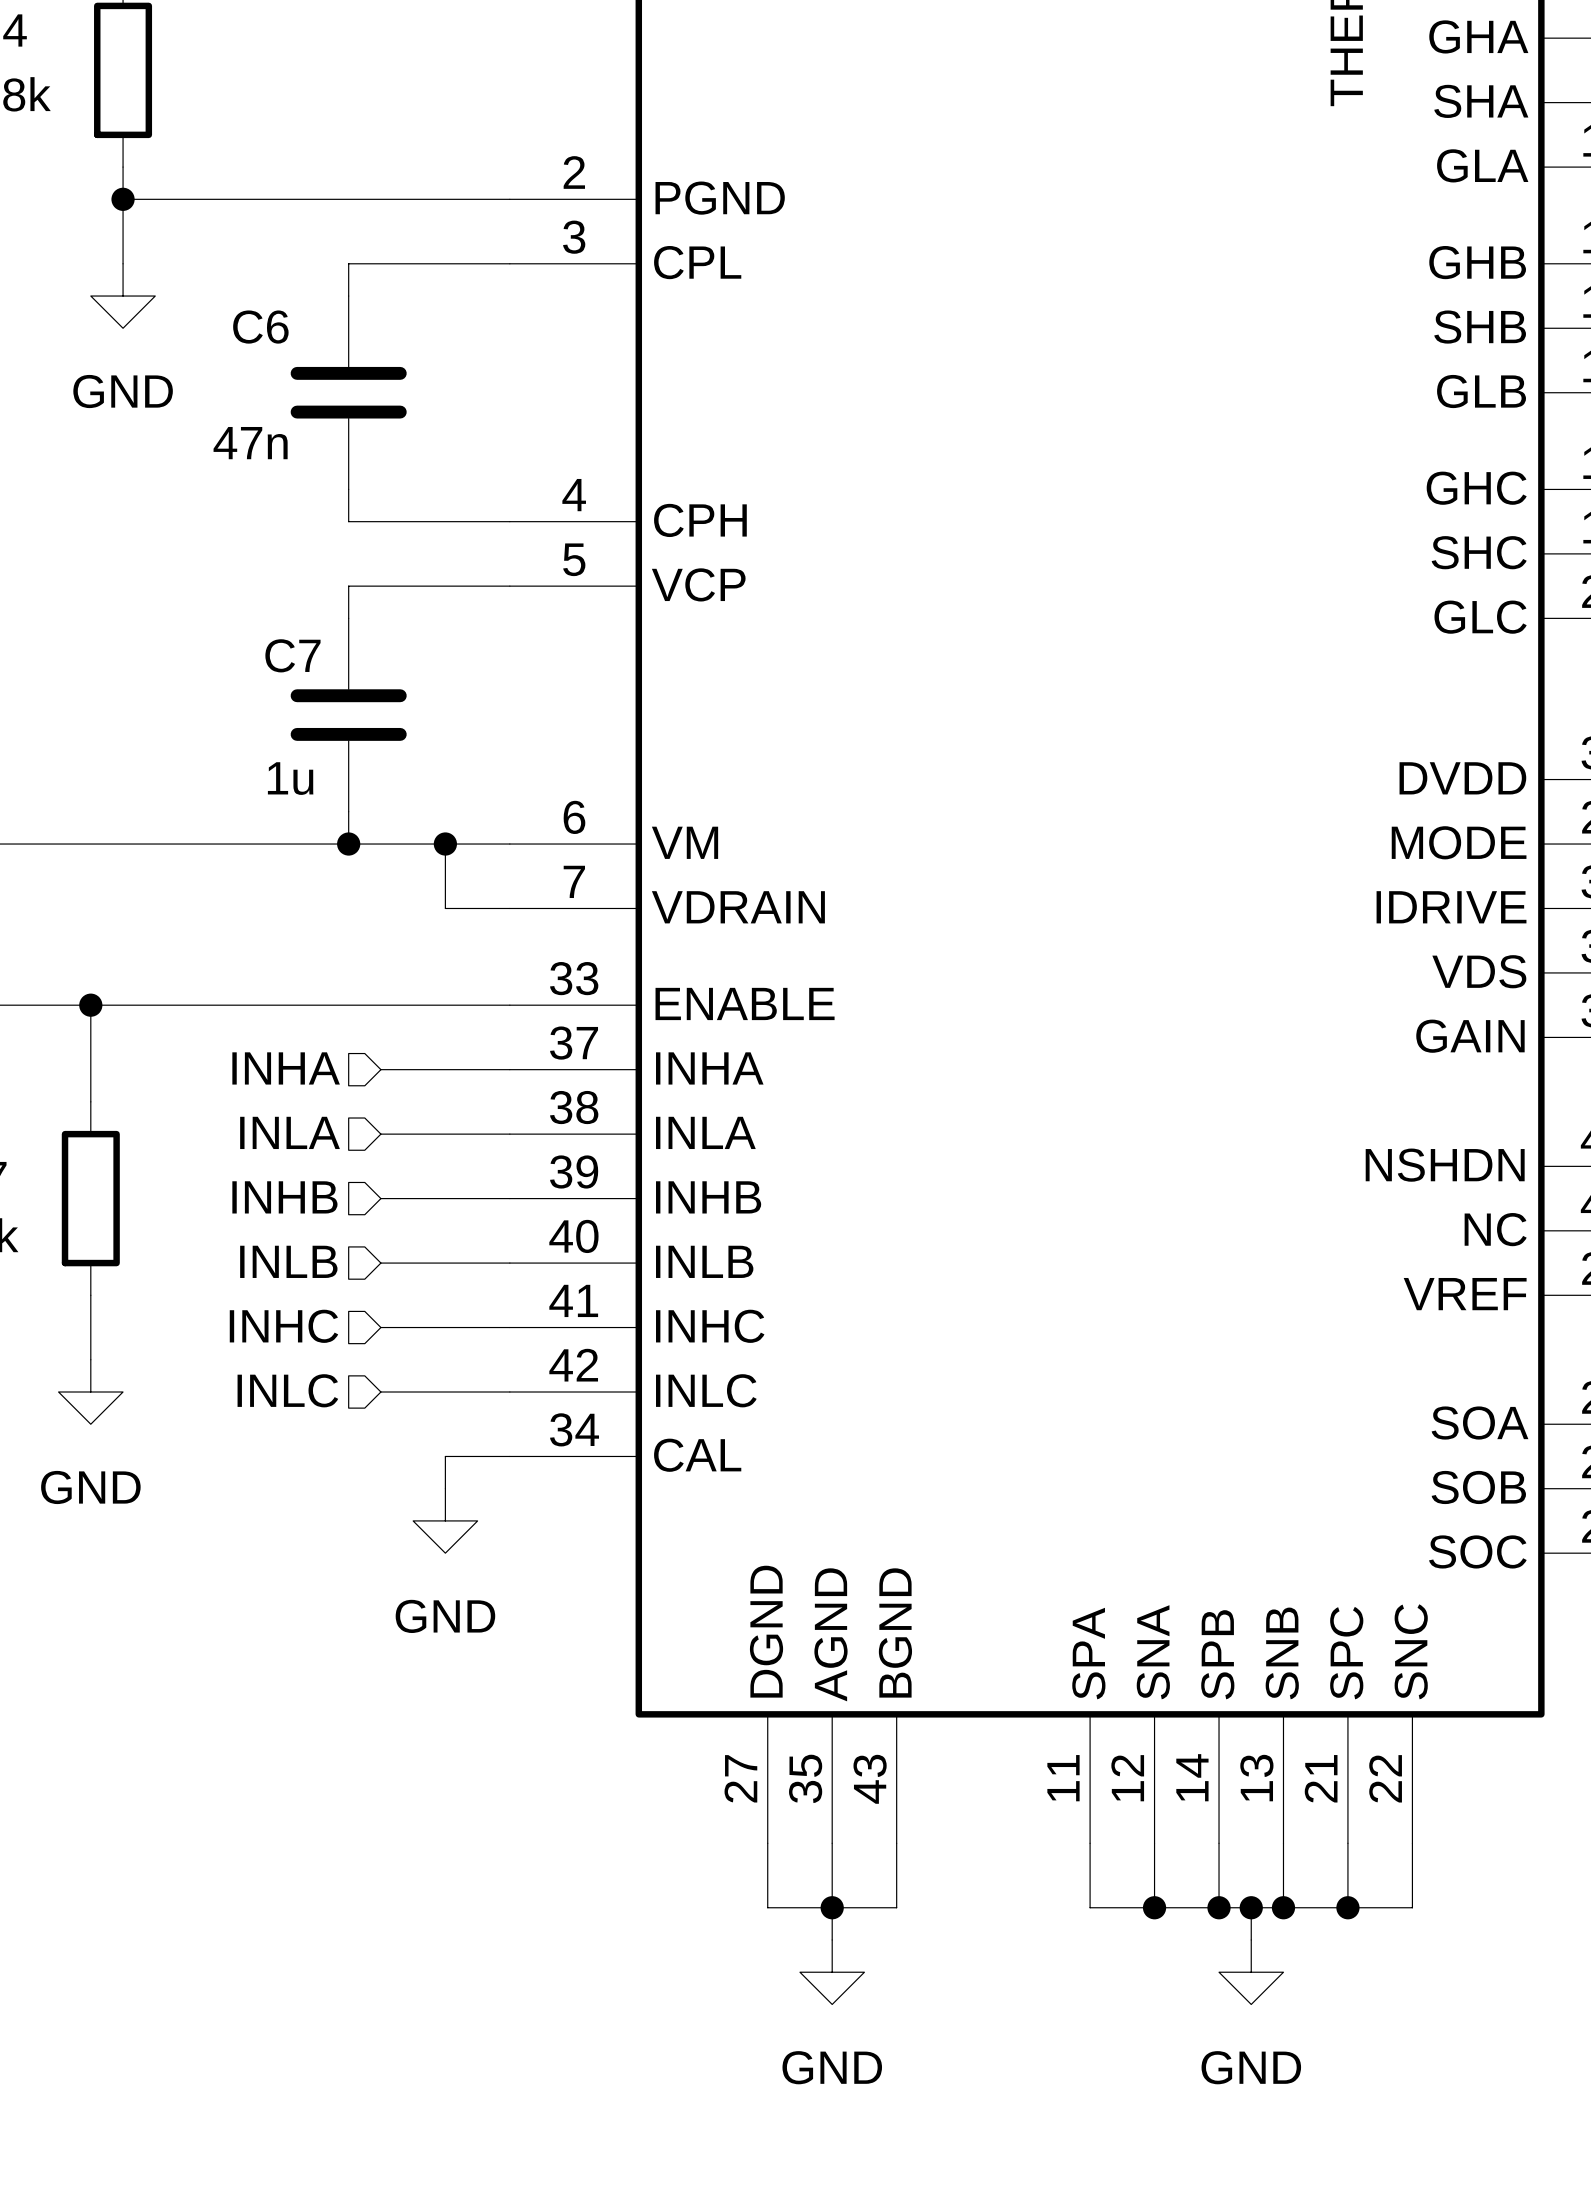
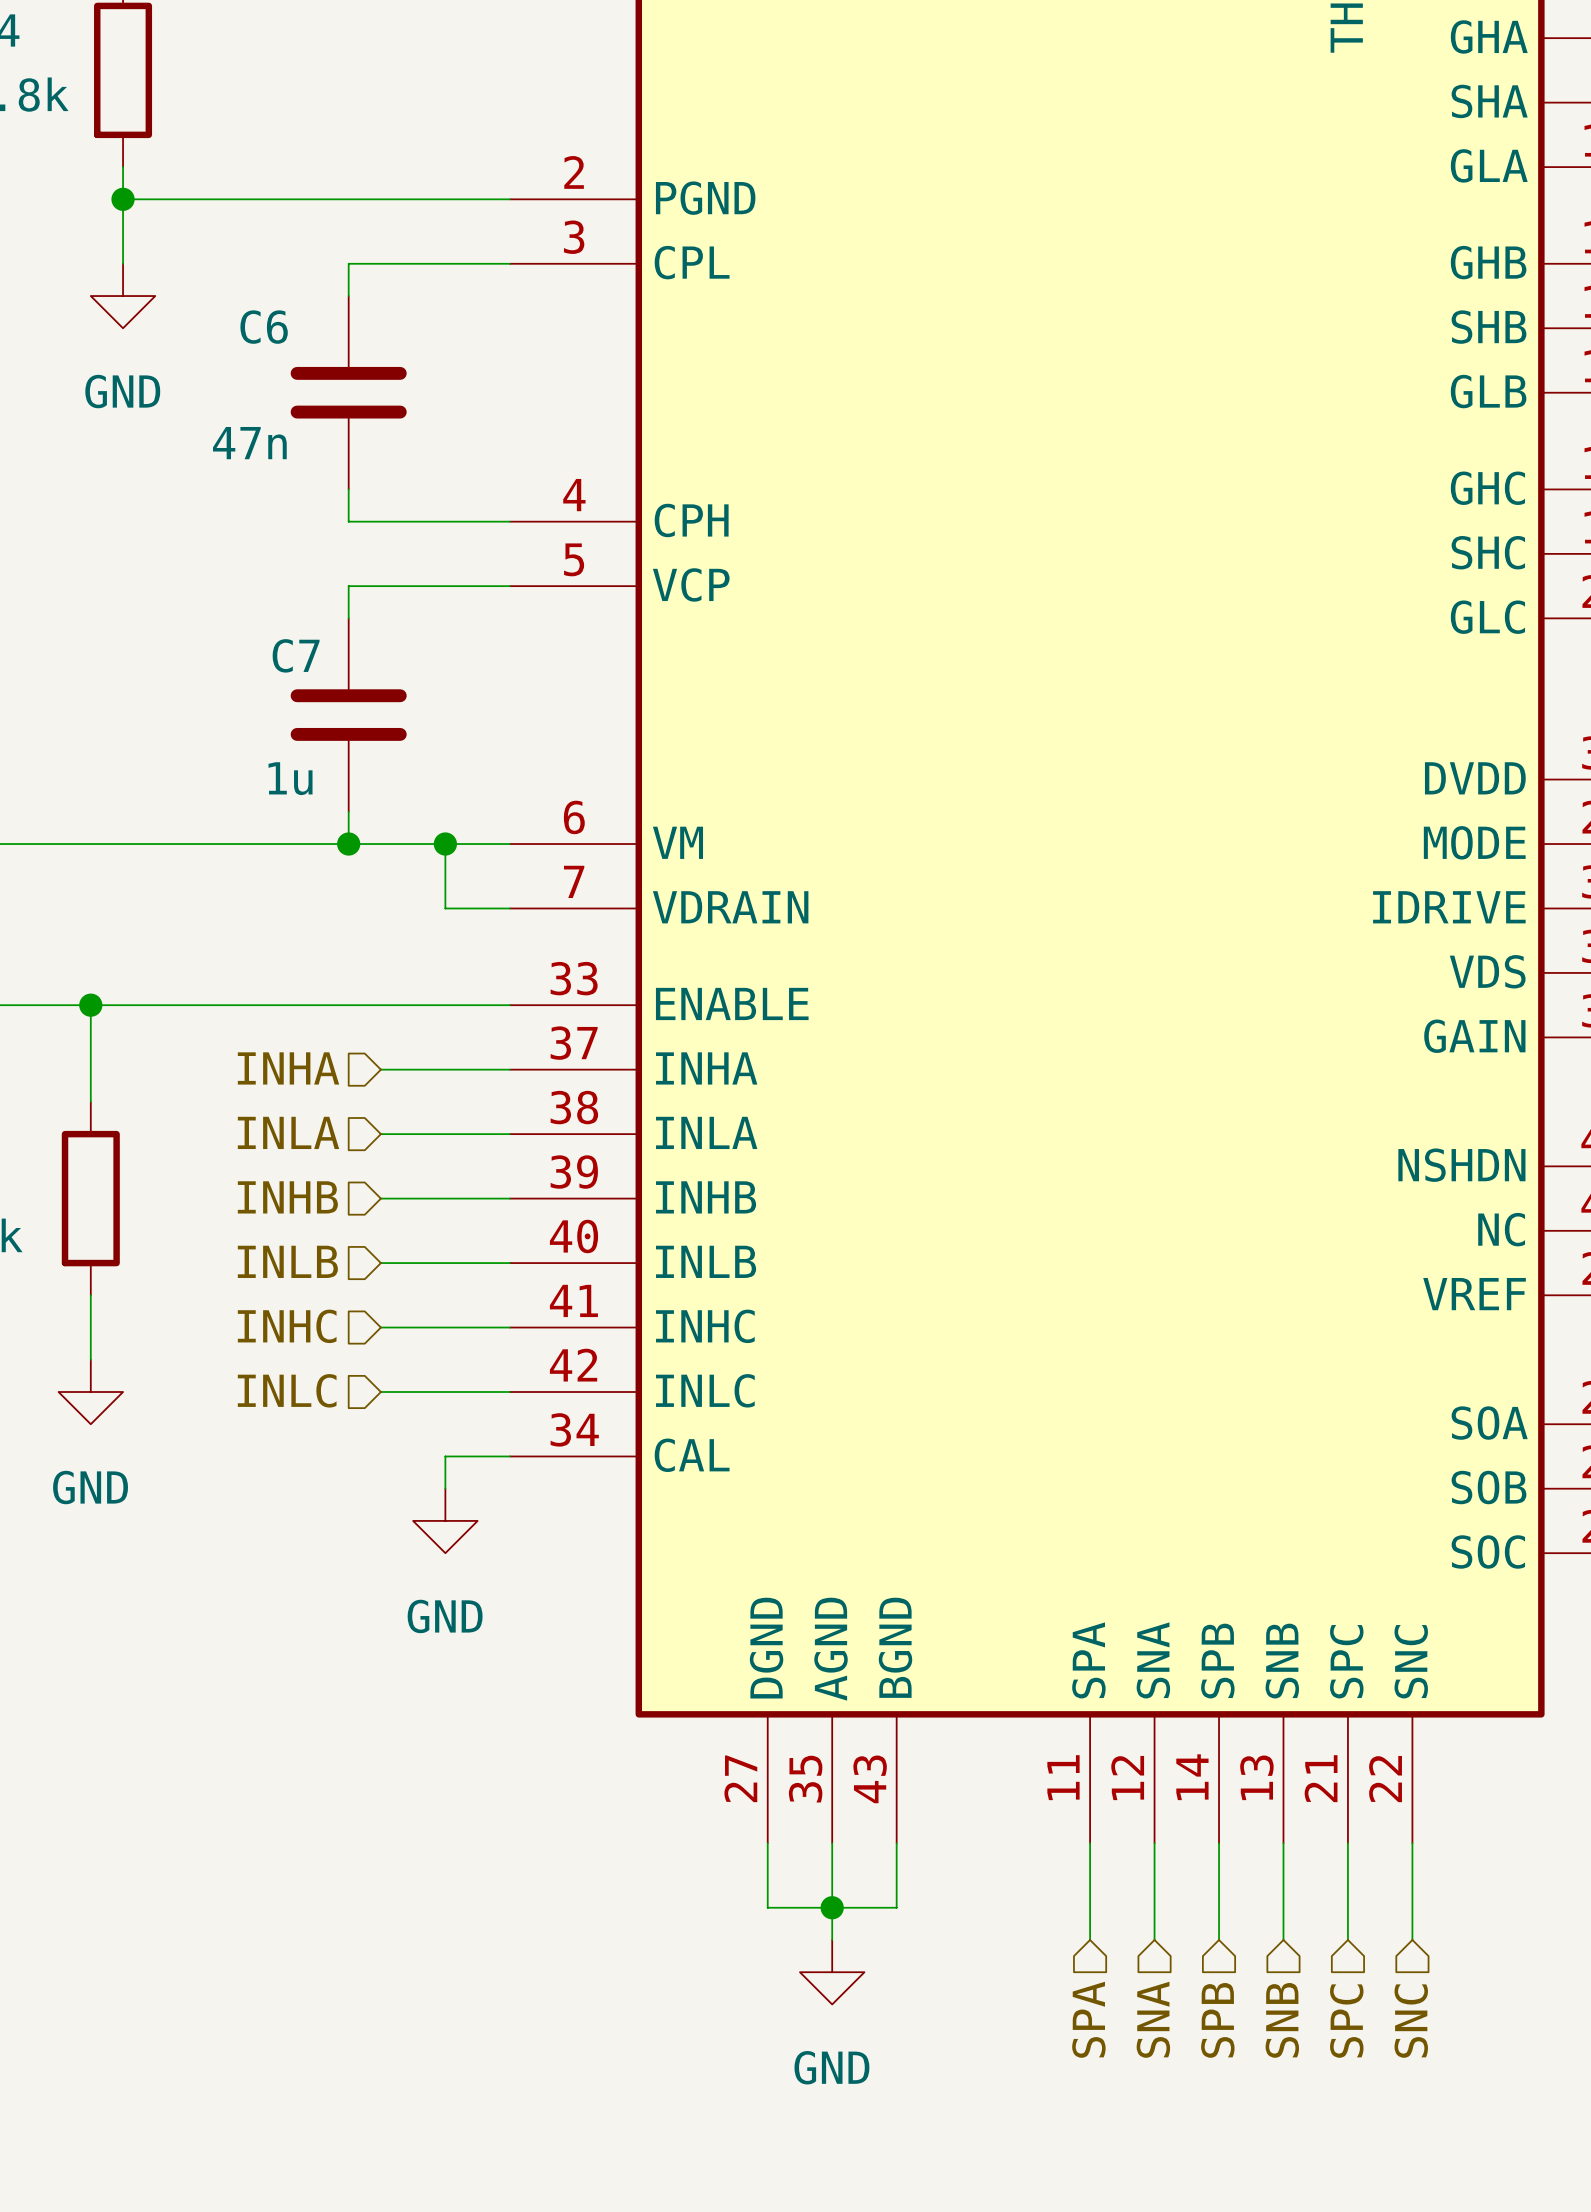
wire: (1090, 1907) (1412, 1907) -> (1090, 1907) (1090, 1939)
wire: none -> (1154, 1907) (1154, 1939)
junction: (1154, 1907) -> none
junction: (1219, 1907) -> none
wire: (1251, 1907) (1251, 1939) -> (1219, 1907) (1219, 1939)
junction: (1251, 1907) -> none
wire: none -> (1283, 1907) (1283, 1939)
junction: (1283, 1907) -> none
wire: none -> (1347, 1907) (1347, 1939)
junction: (1347, 1907) -> none
wire: none -> (1412, 1907) (1412, 1939)
power symbol: GND (1251, 1972) -> none
hierarchical label: none -> SPA (1088, 2019)
hierarchical label: none -> SPB (1217, 2020)
hierarchical label: none -> SNA (1153, 2019)
hierarchical label: none -> SPC (1346, 2021)
hierarchical label: none -> SNB (1282, 2020)
hierarchical label: none -> SNC (1411, 2021)

